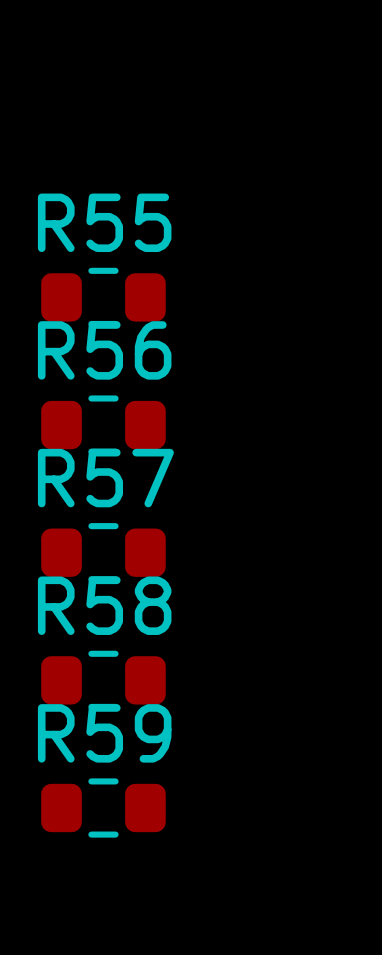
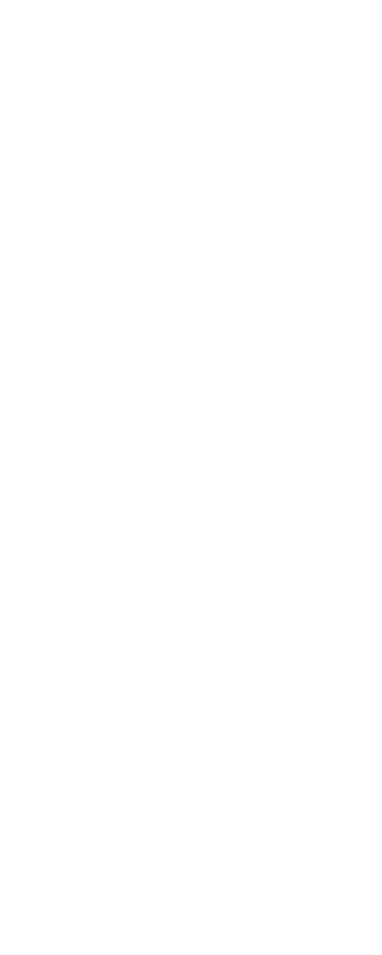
R55: (103, 297) -> none
R56: (103, 425) -> none
R57: (103, 552) -> none
R58: (103, 680) -> none
R59: (103, 808) -> none

